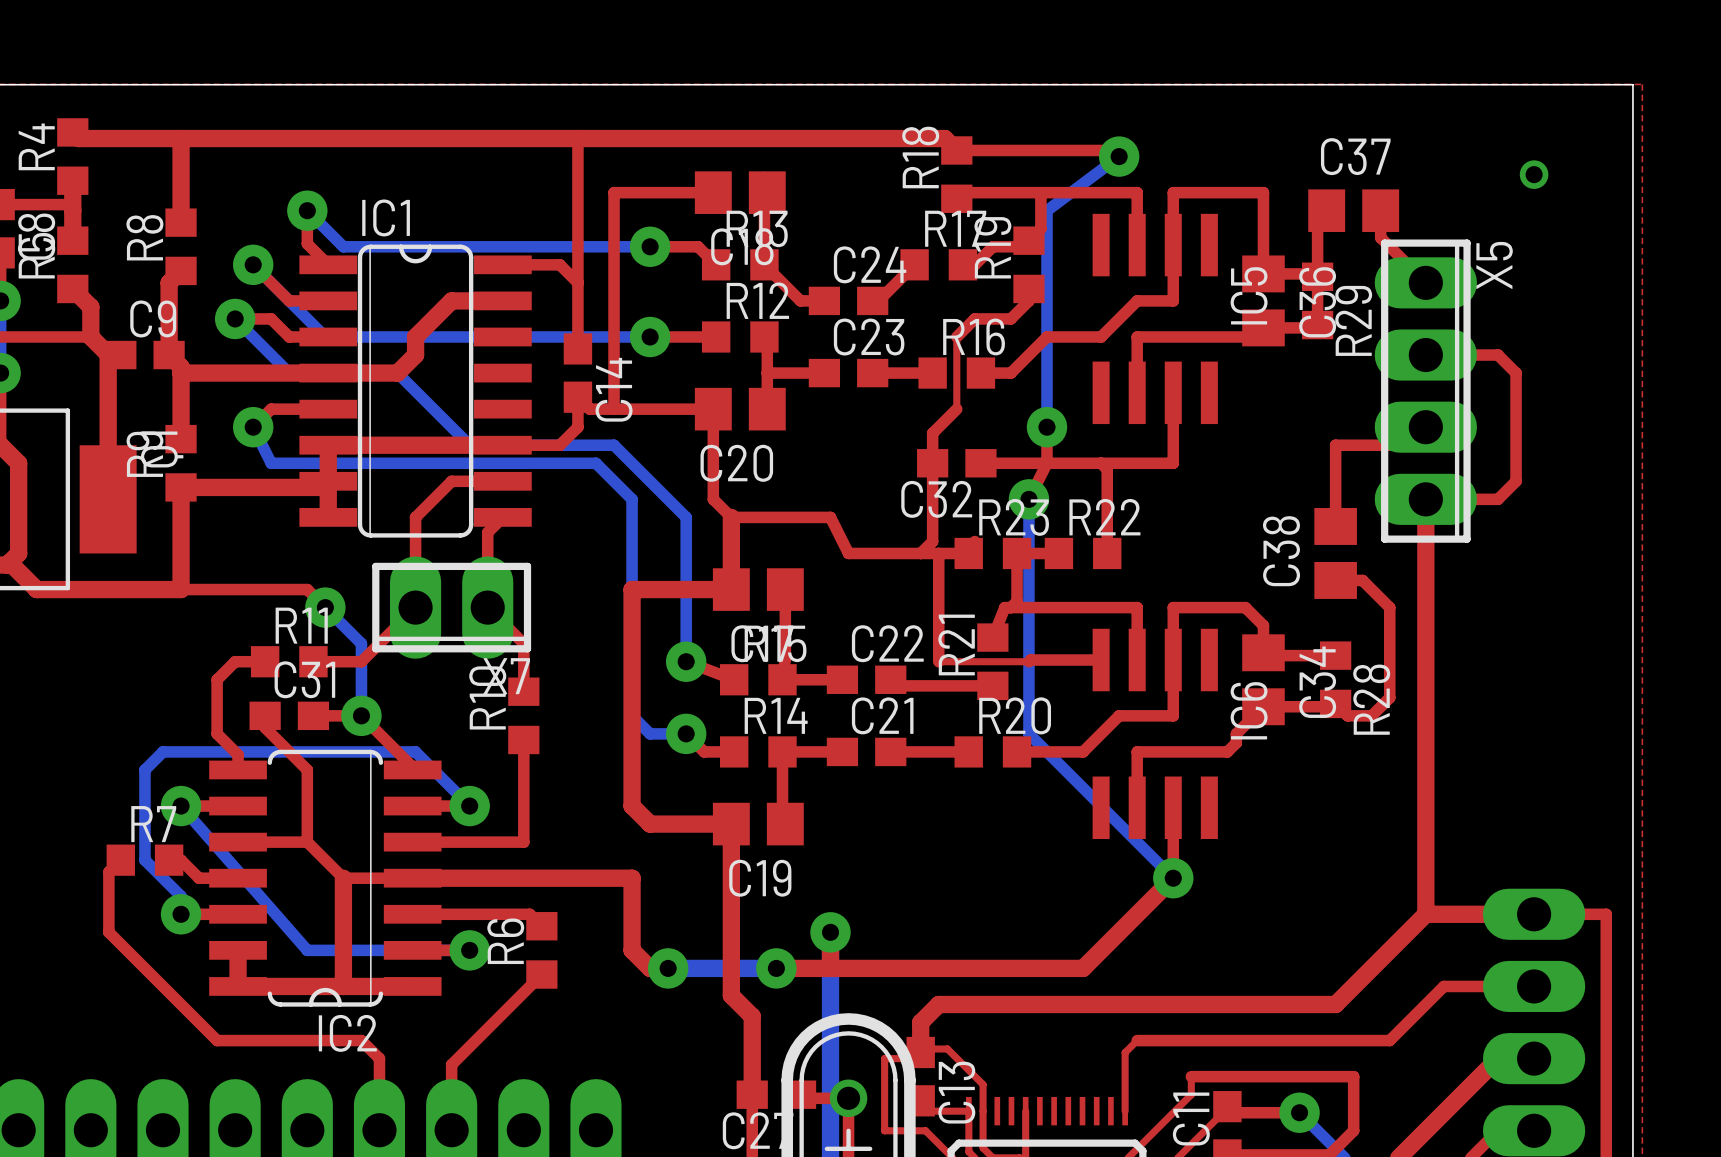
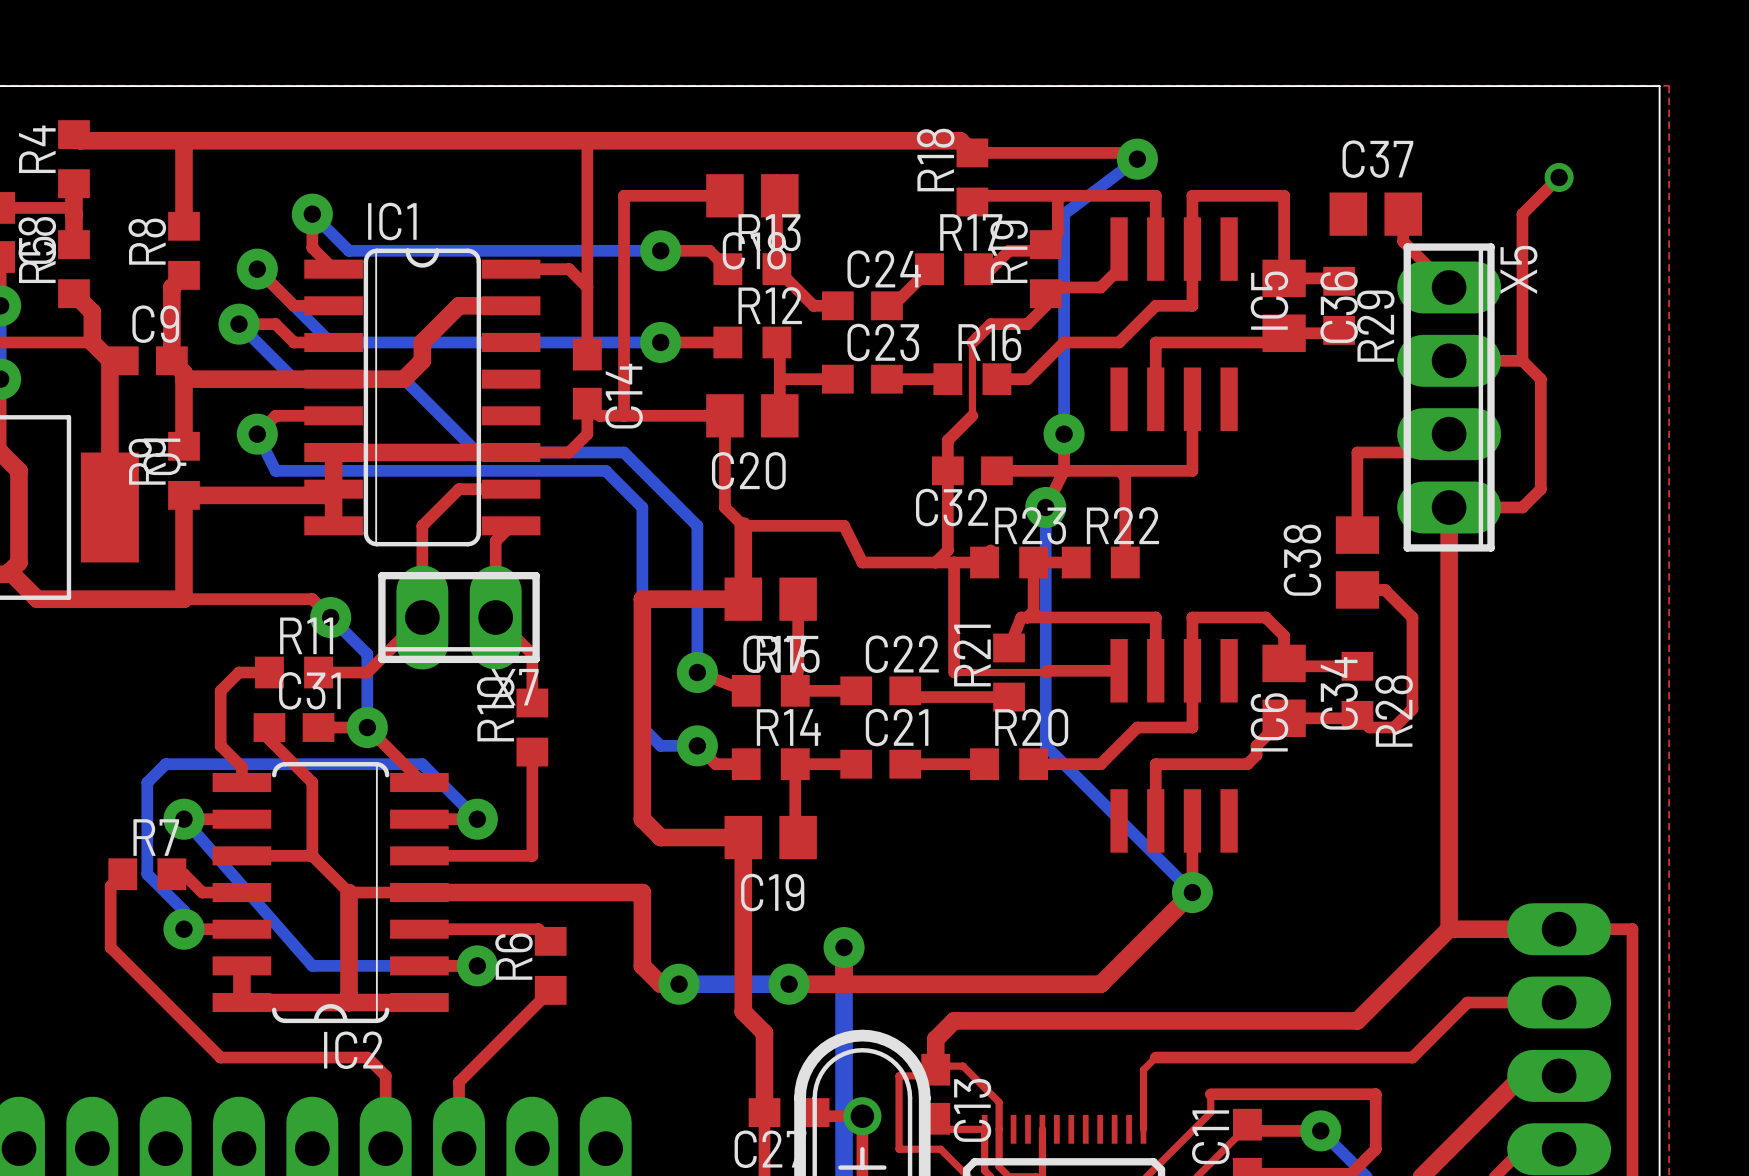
top track: none -> (1559, 177) (1522, 214) (1522, 360)
top track: (1317, 219) (1317, 325) -> none
top track: none -> (1119, 249) (1119, 269) (1100, 287) (1051, 287) (1045, 293)

